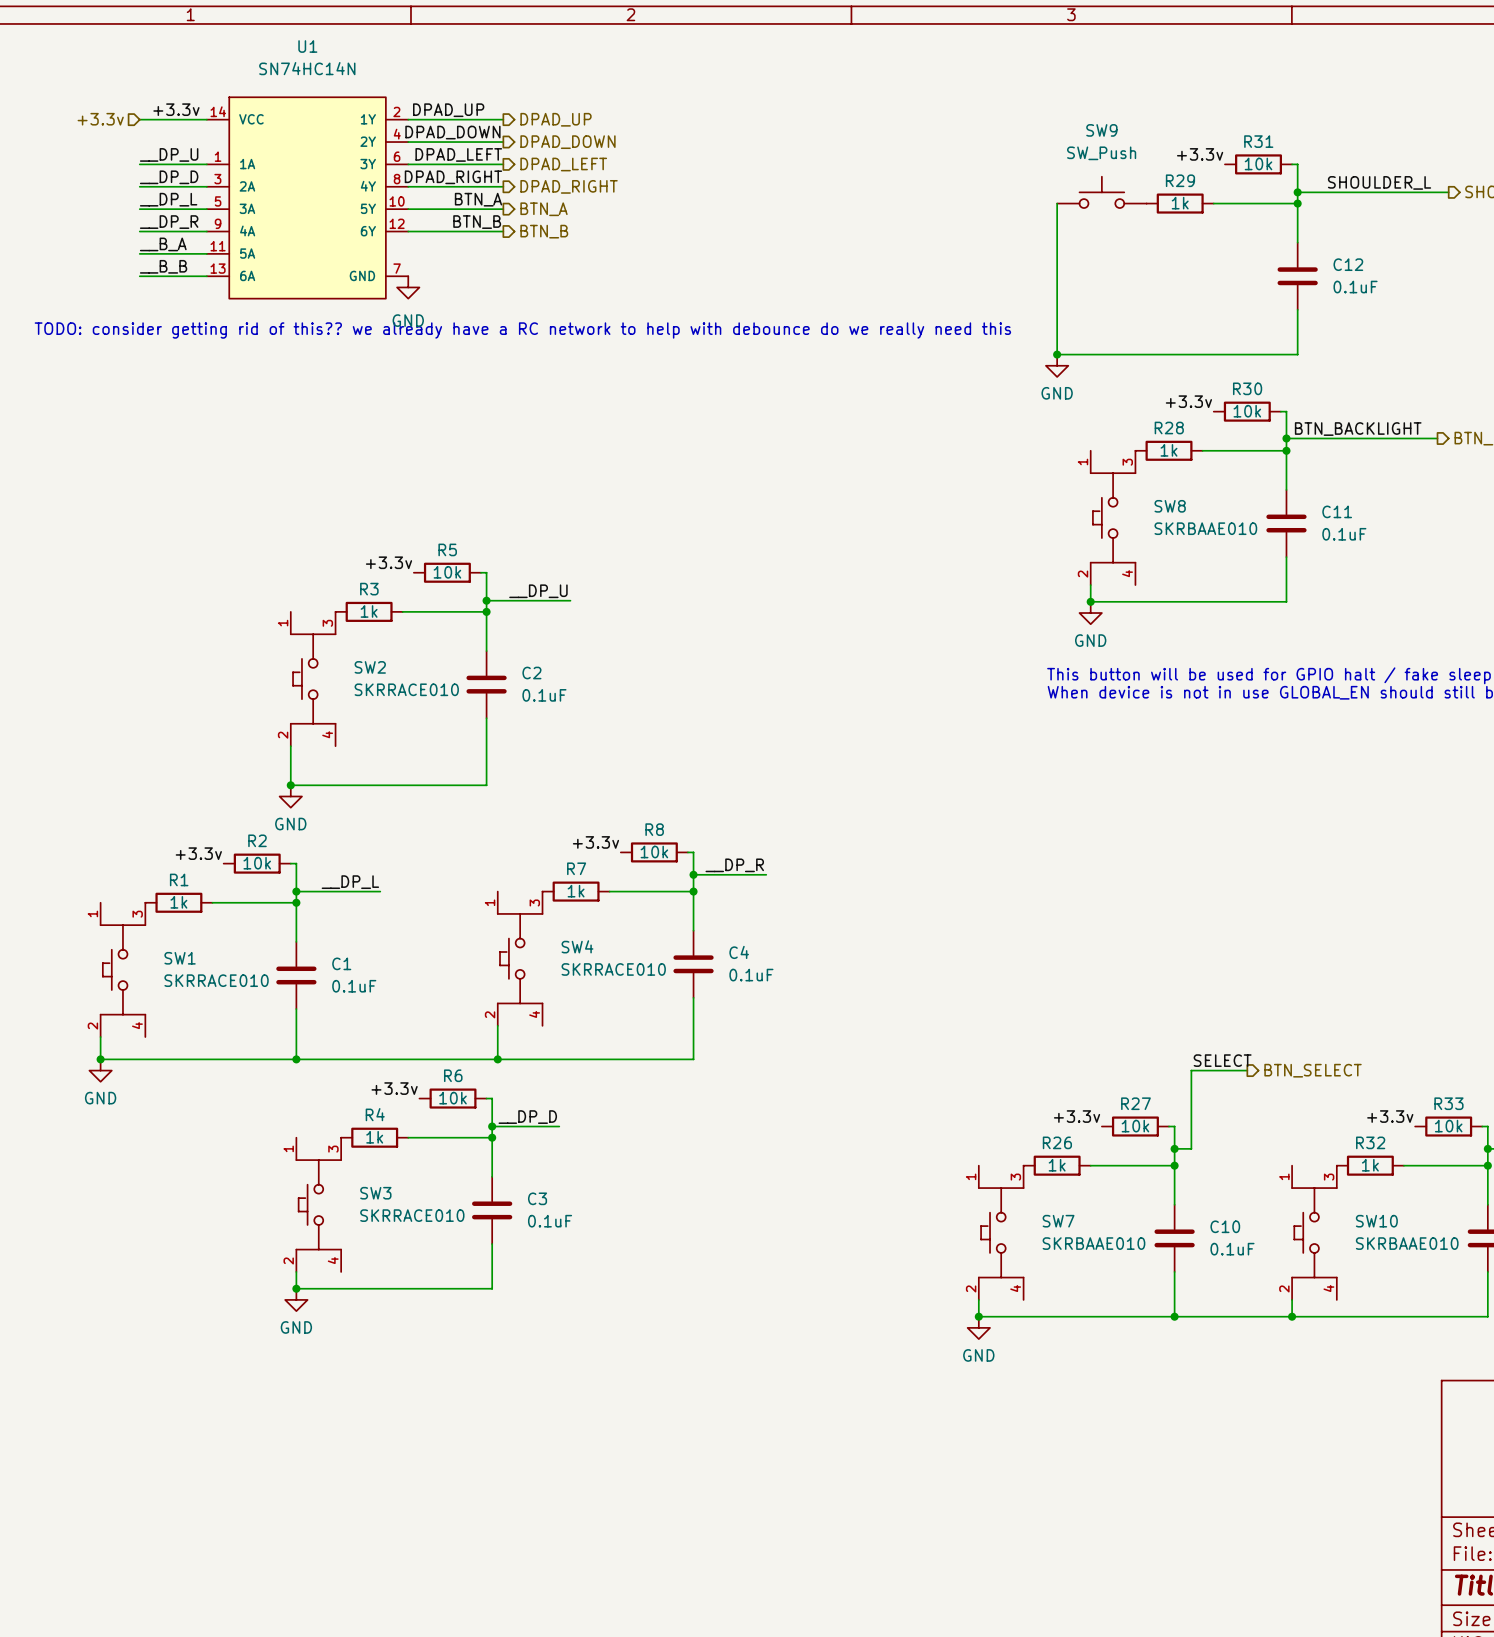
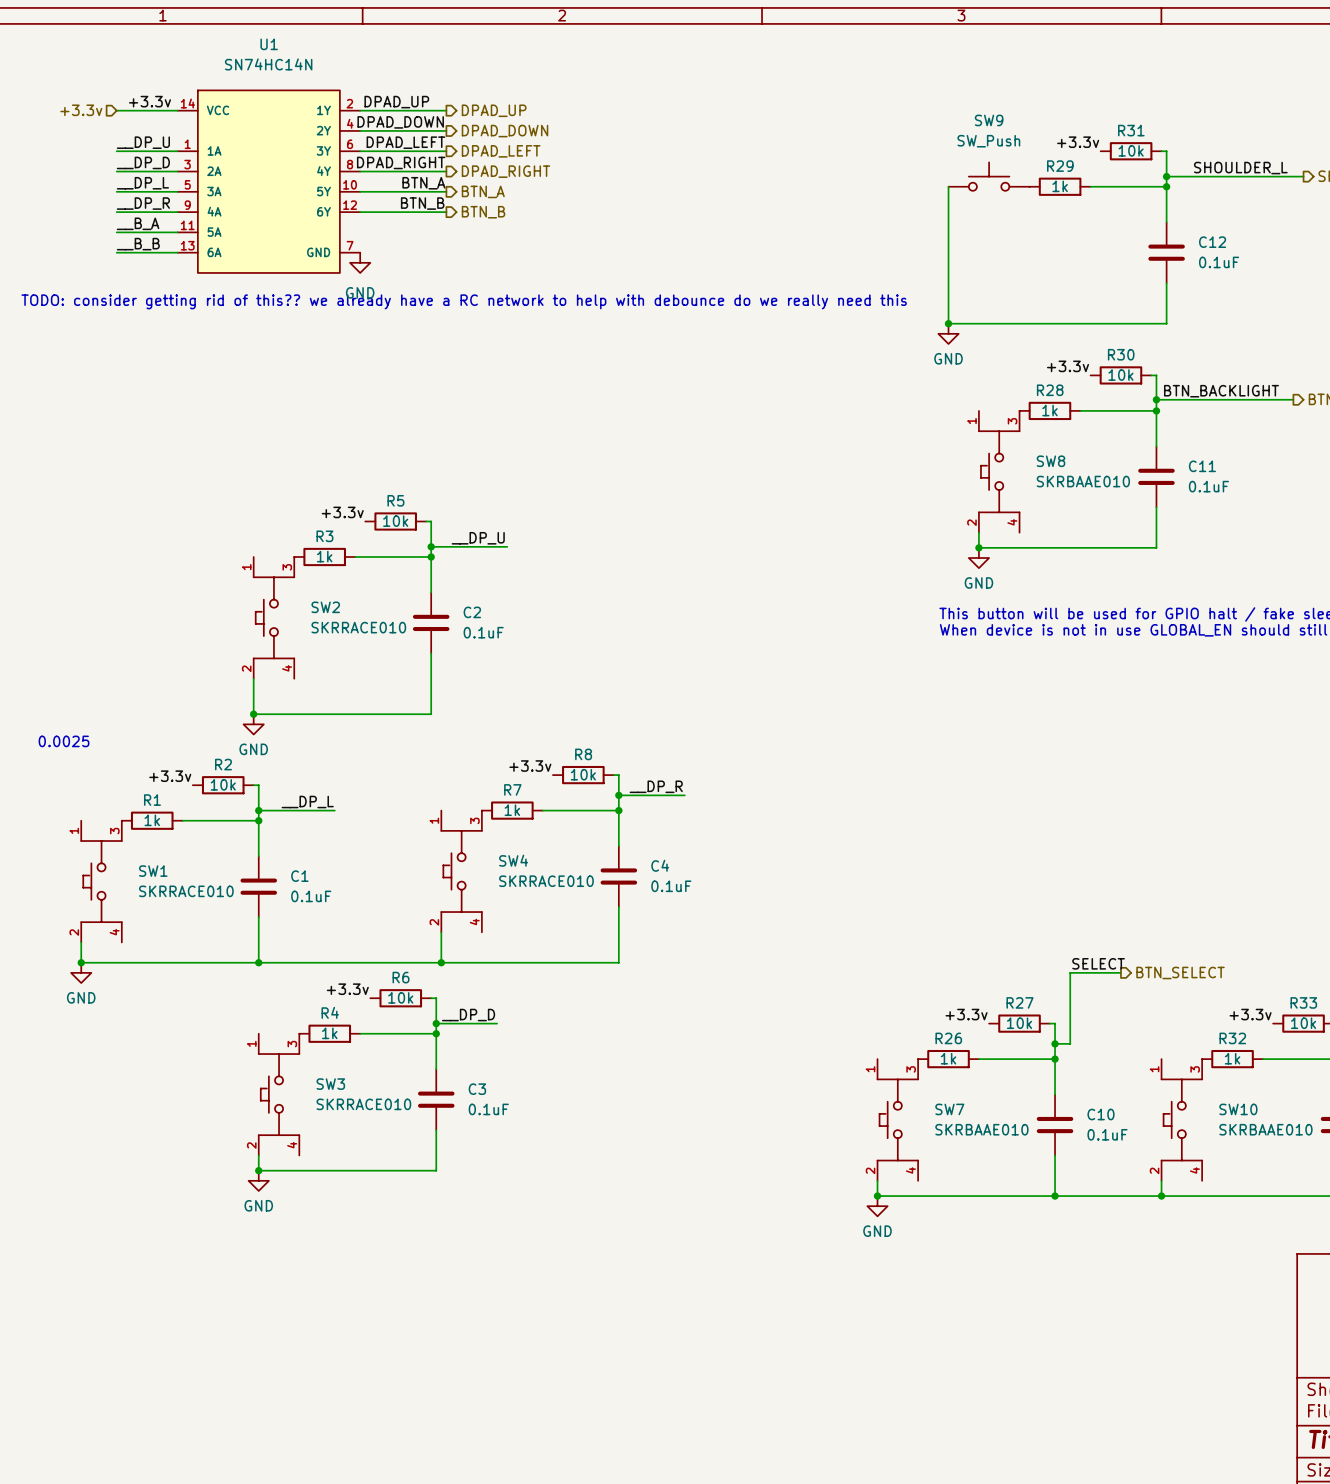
text: none -> 0.0025 (64, 741)

